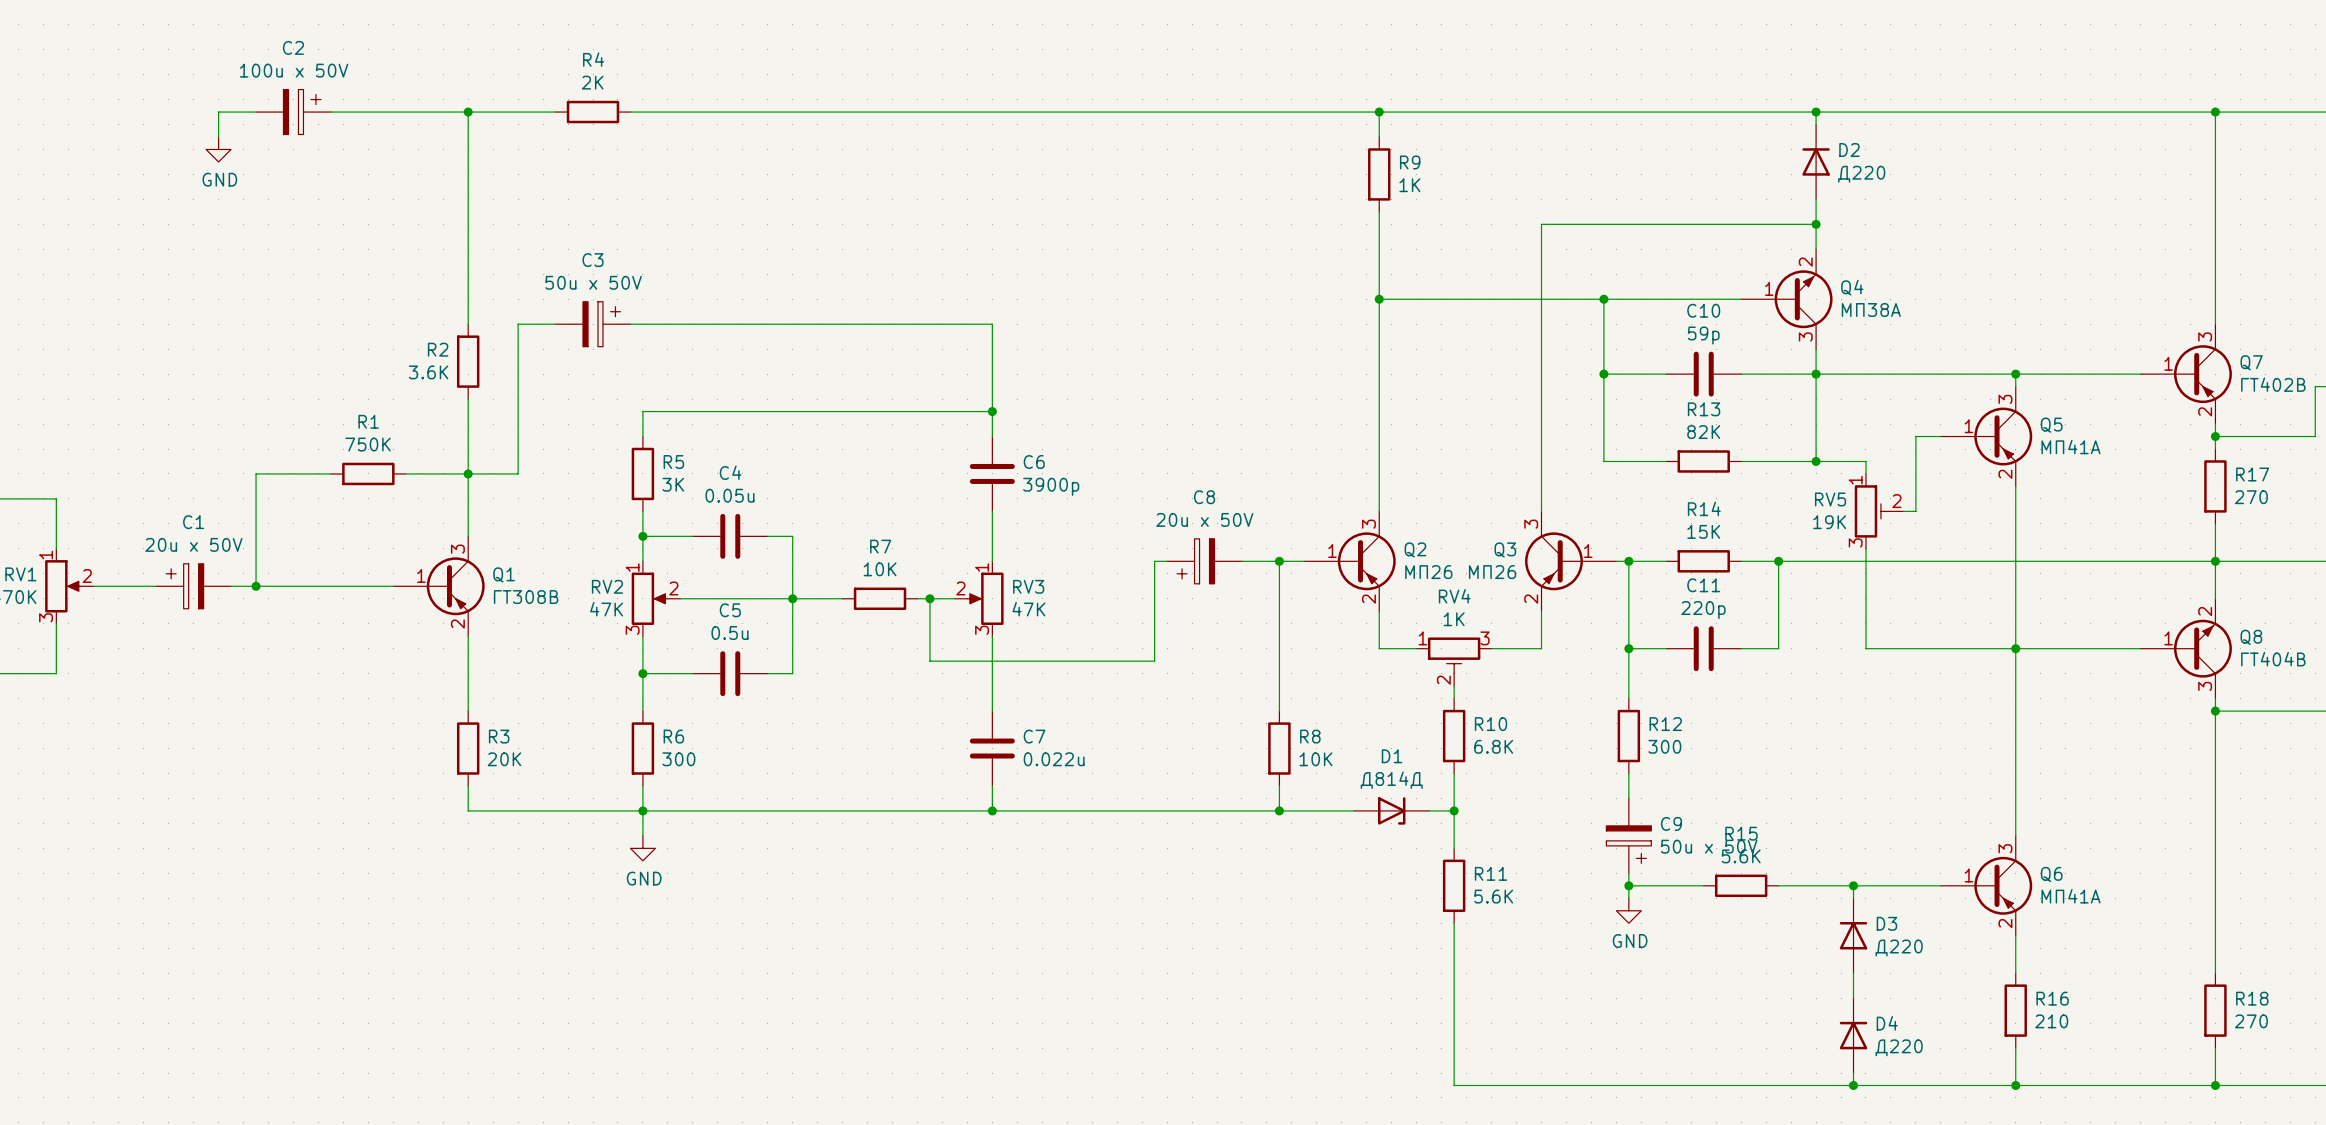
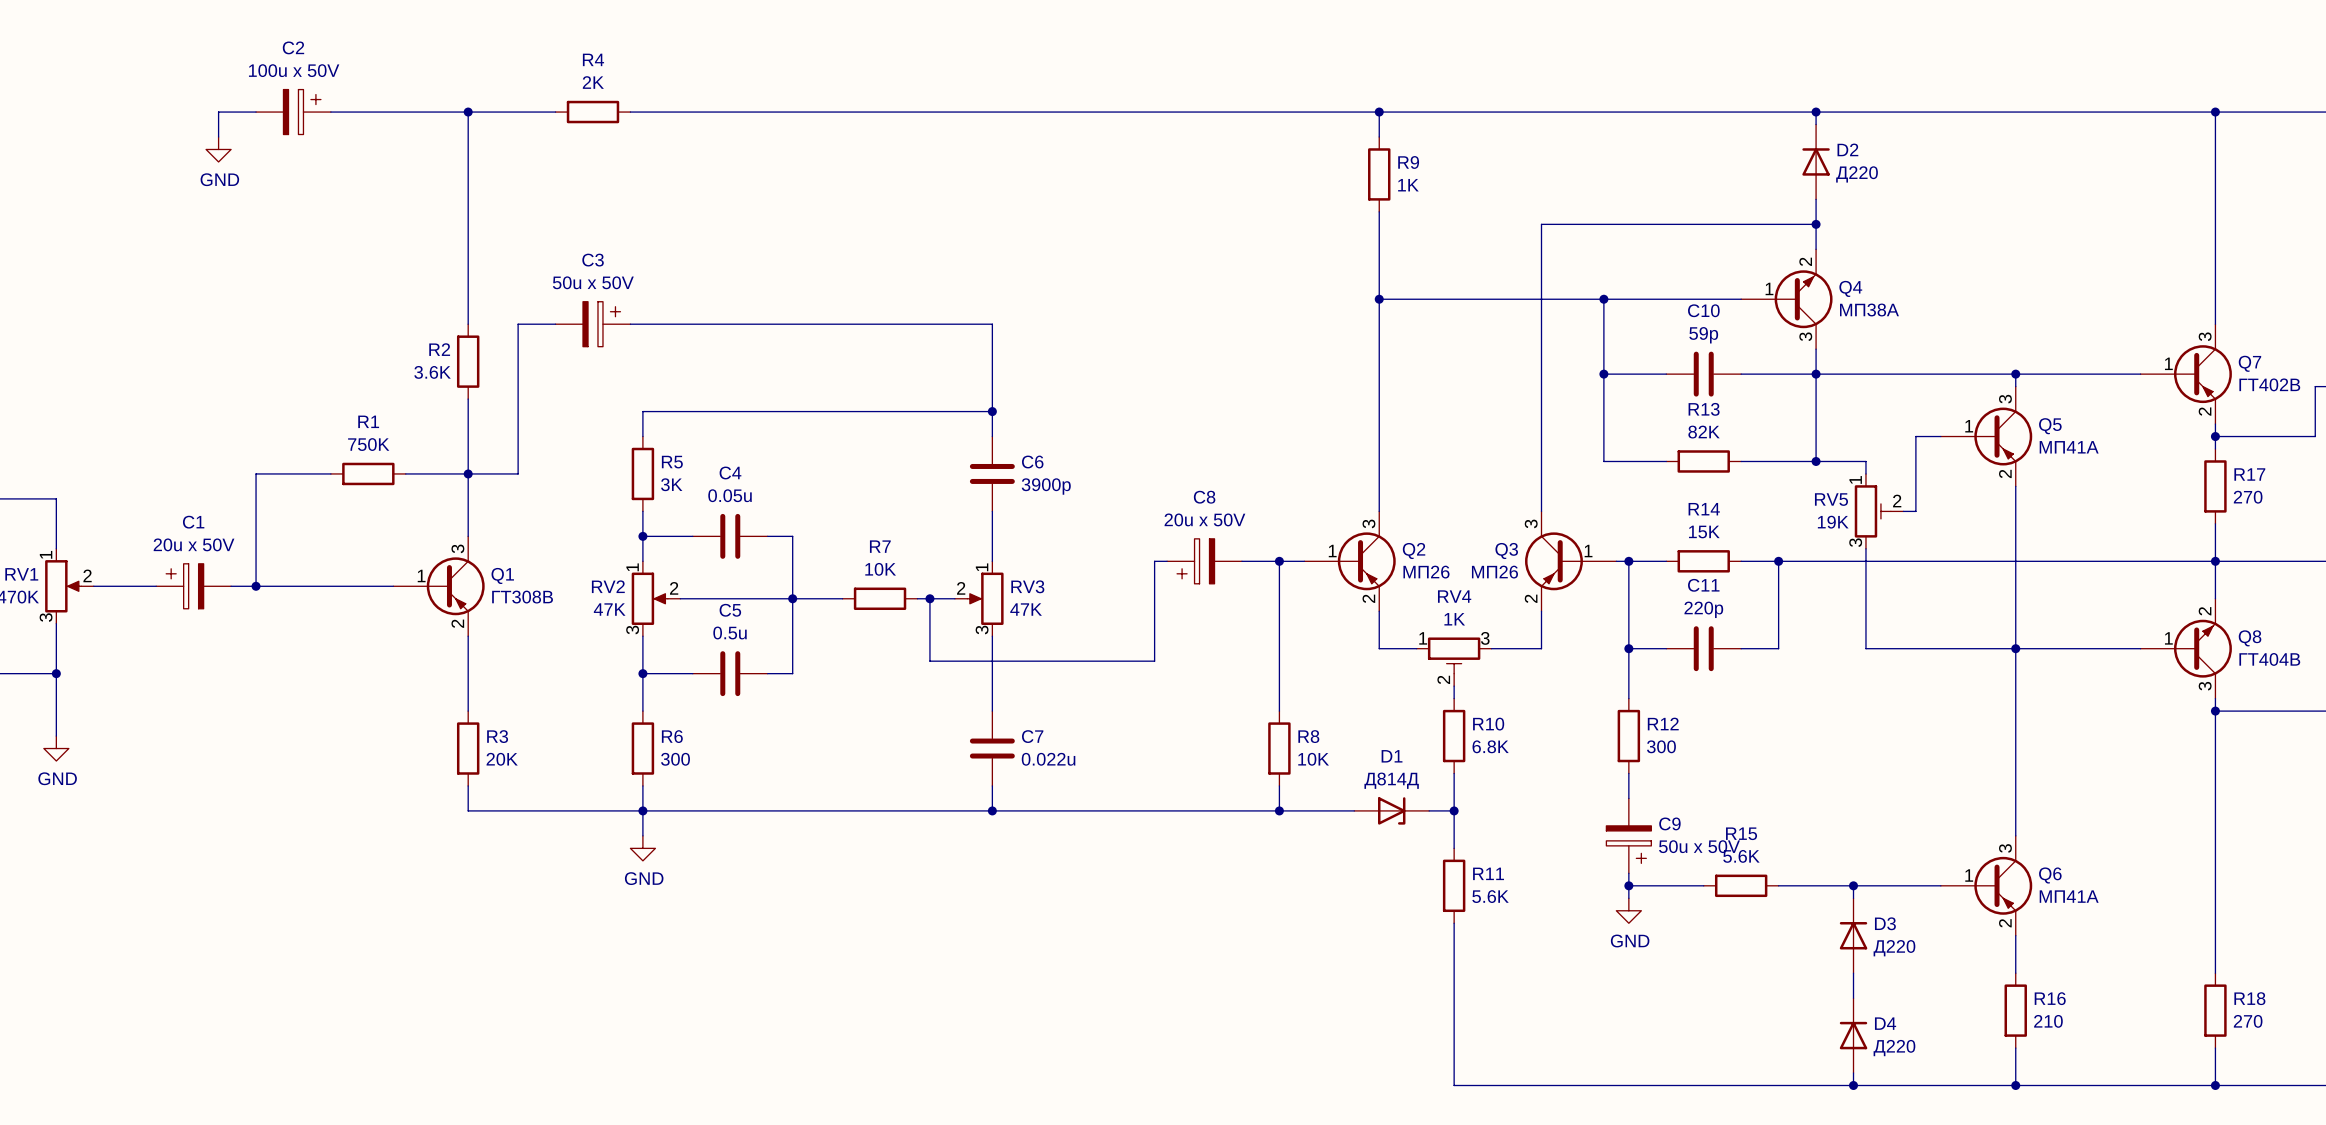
wire: none -> (56, 673) (56, 736)
junction: none -> (56, 673)
power symbol: none -> GND (56, 748)

